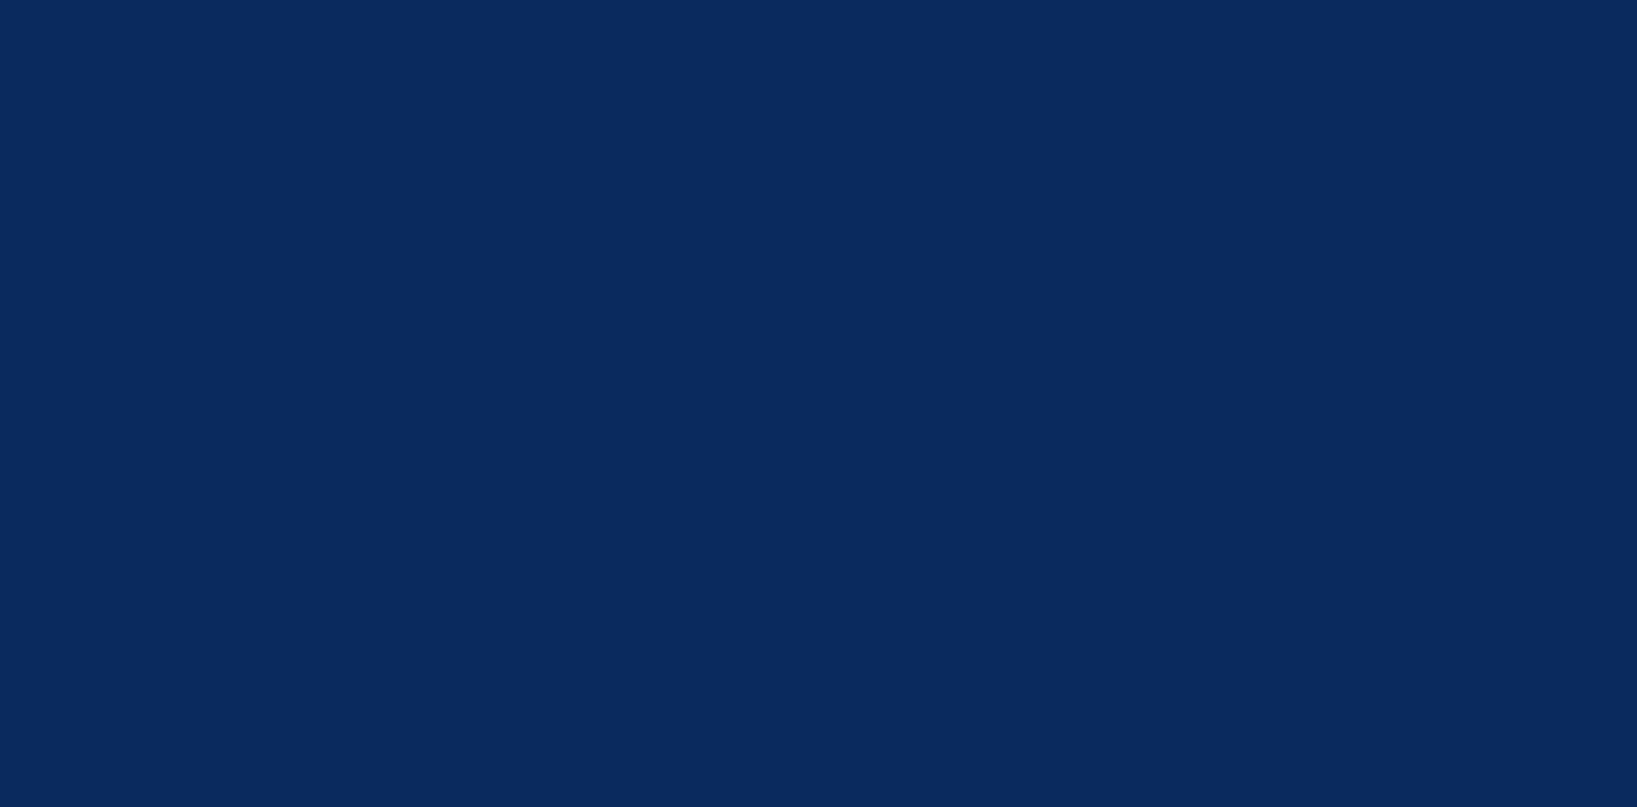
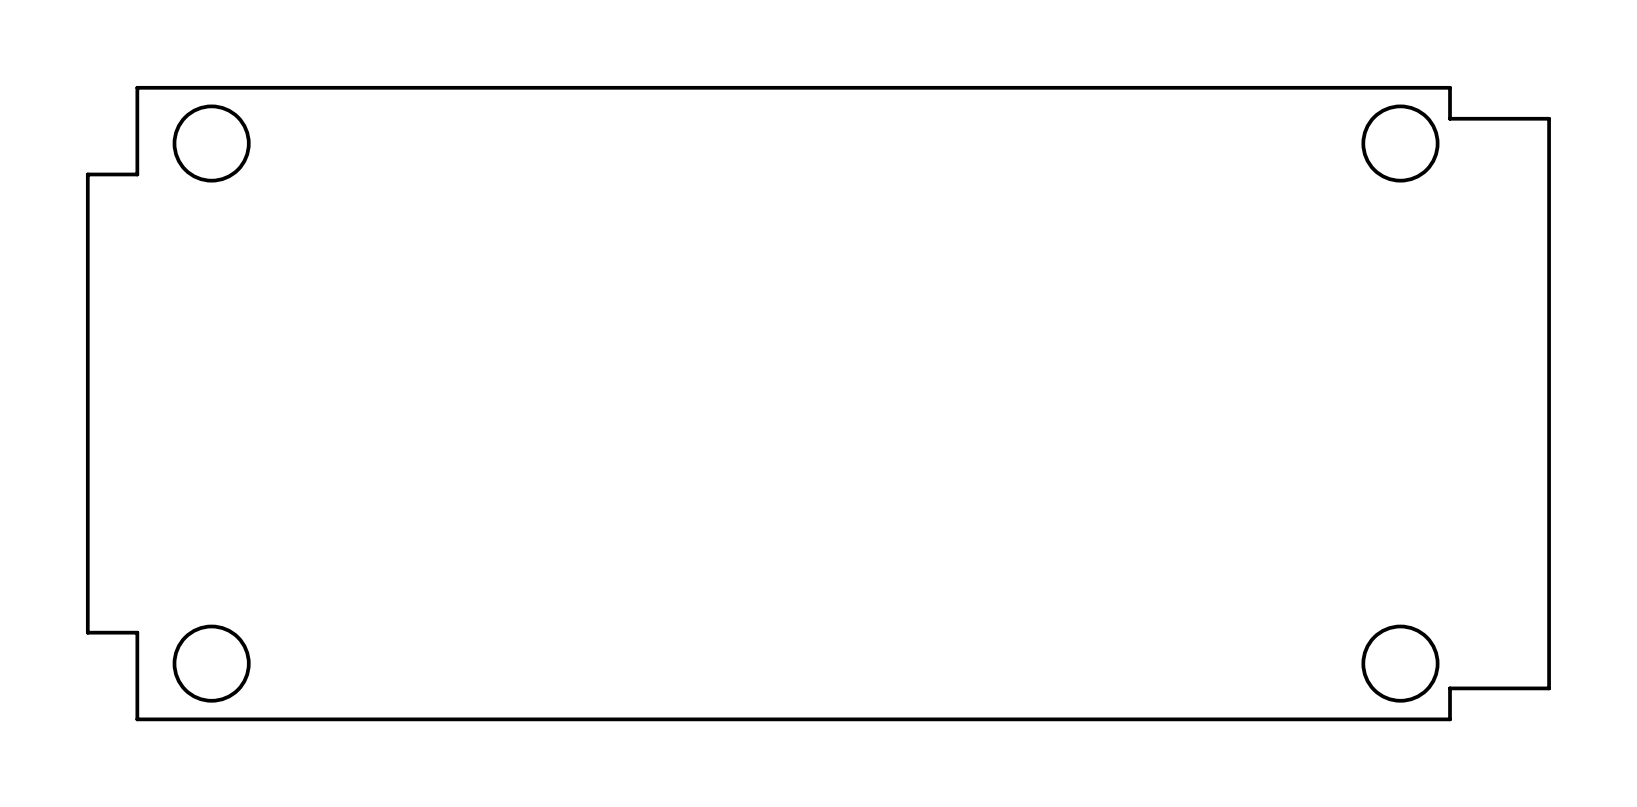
board edge: none -> (137, 87) (137, 174) (87, 174) (87, 632) (137, 632) (137, 719) (1450, 719) (1450, 688) (1549, 688) (1549, 118) (1450, 118) (1450, 87) (137, 87)
round board edge: none -> [172, 104, 251, 183]
round board edge: none -> [1361, 104, 1440, 183]
round board edge: none -> [172, 624, 251, 703]
round board edge: none -> [1361, 624, 1440, 703]

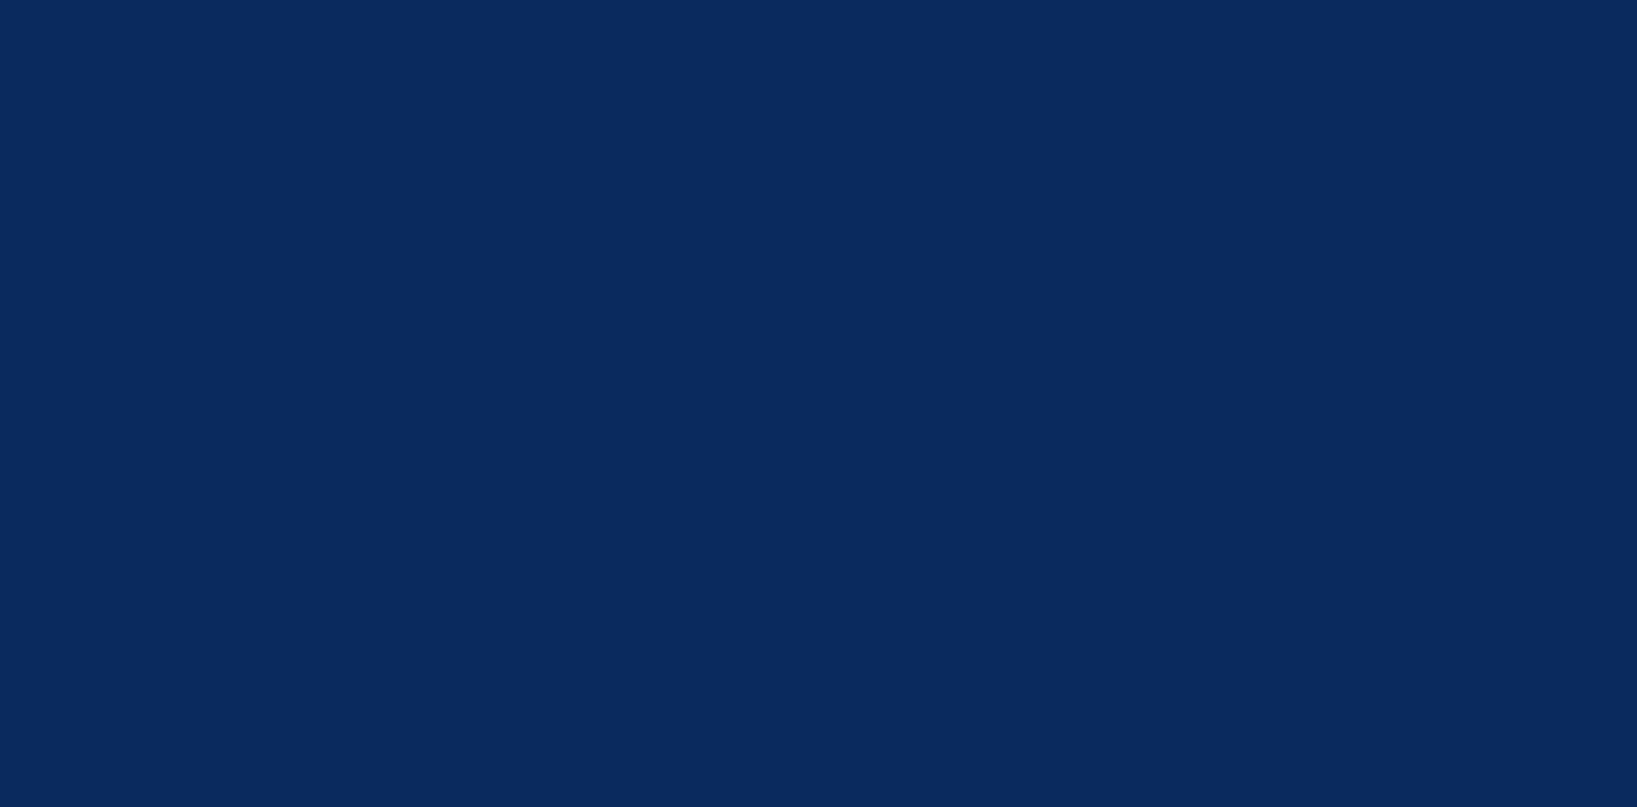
board edge: (137, 87) (137, 174) (87, 174) (87, 632) (137, 632) (137, 719) (1450, 719) (1450, 688) (1549, 688) (1549, 118) (1450, 118) (1450, 87) (137, 87) -> none
round board edge: [172, 104, 251, 183] -> none
round board edge: [1361, 104, 1440, 183] -> none
round board edge: [172, 624, 251, 703] -> none
round board edge: [1361, 624, 1440, 703] -> none

